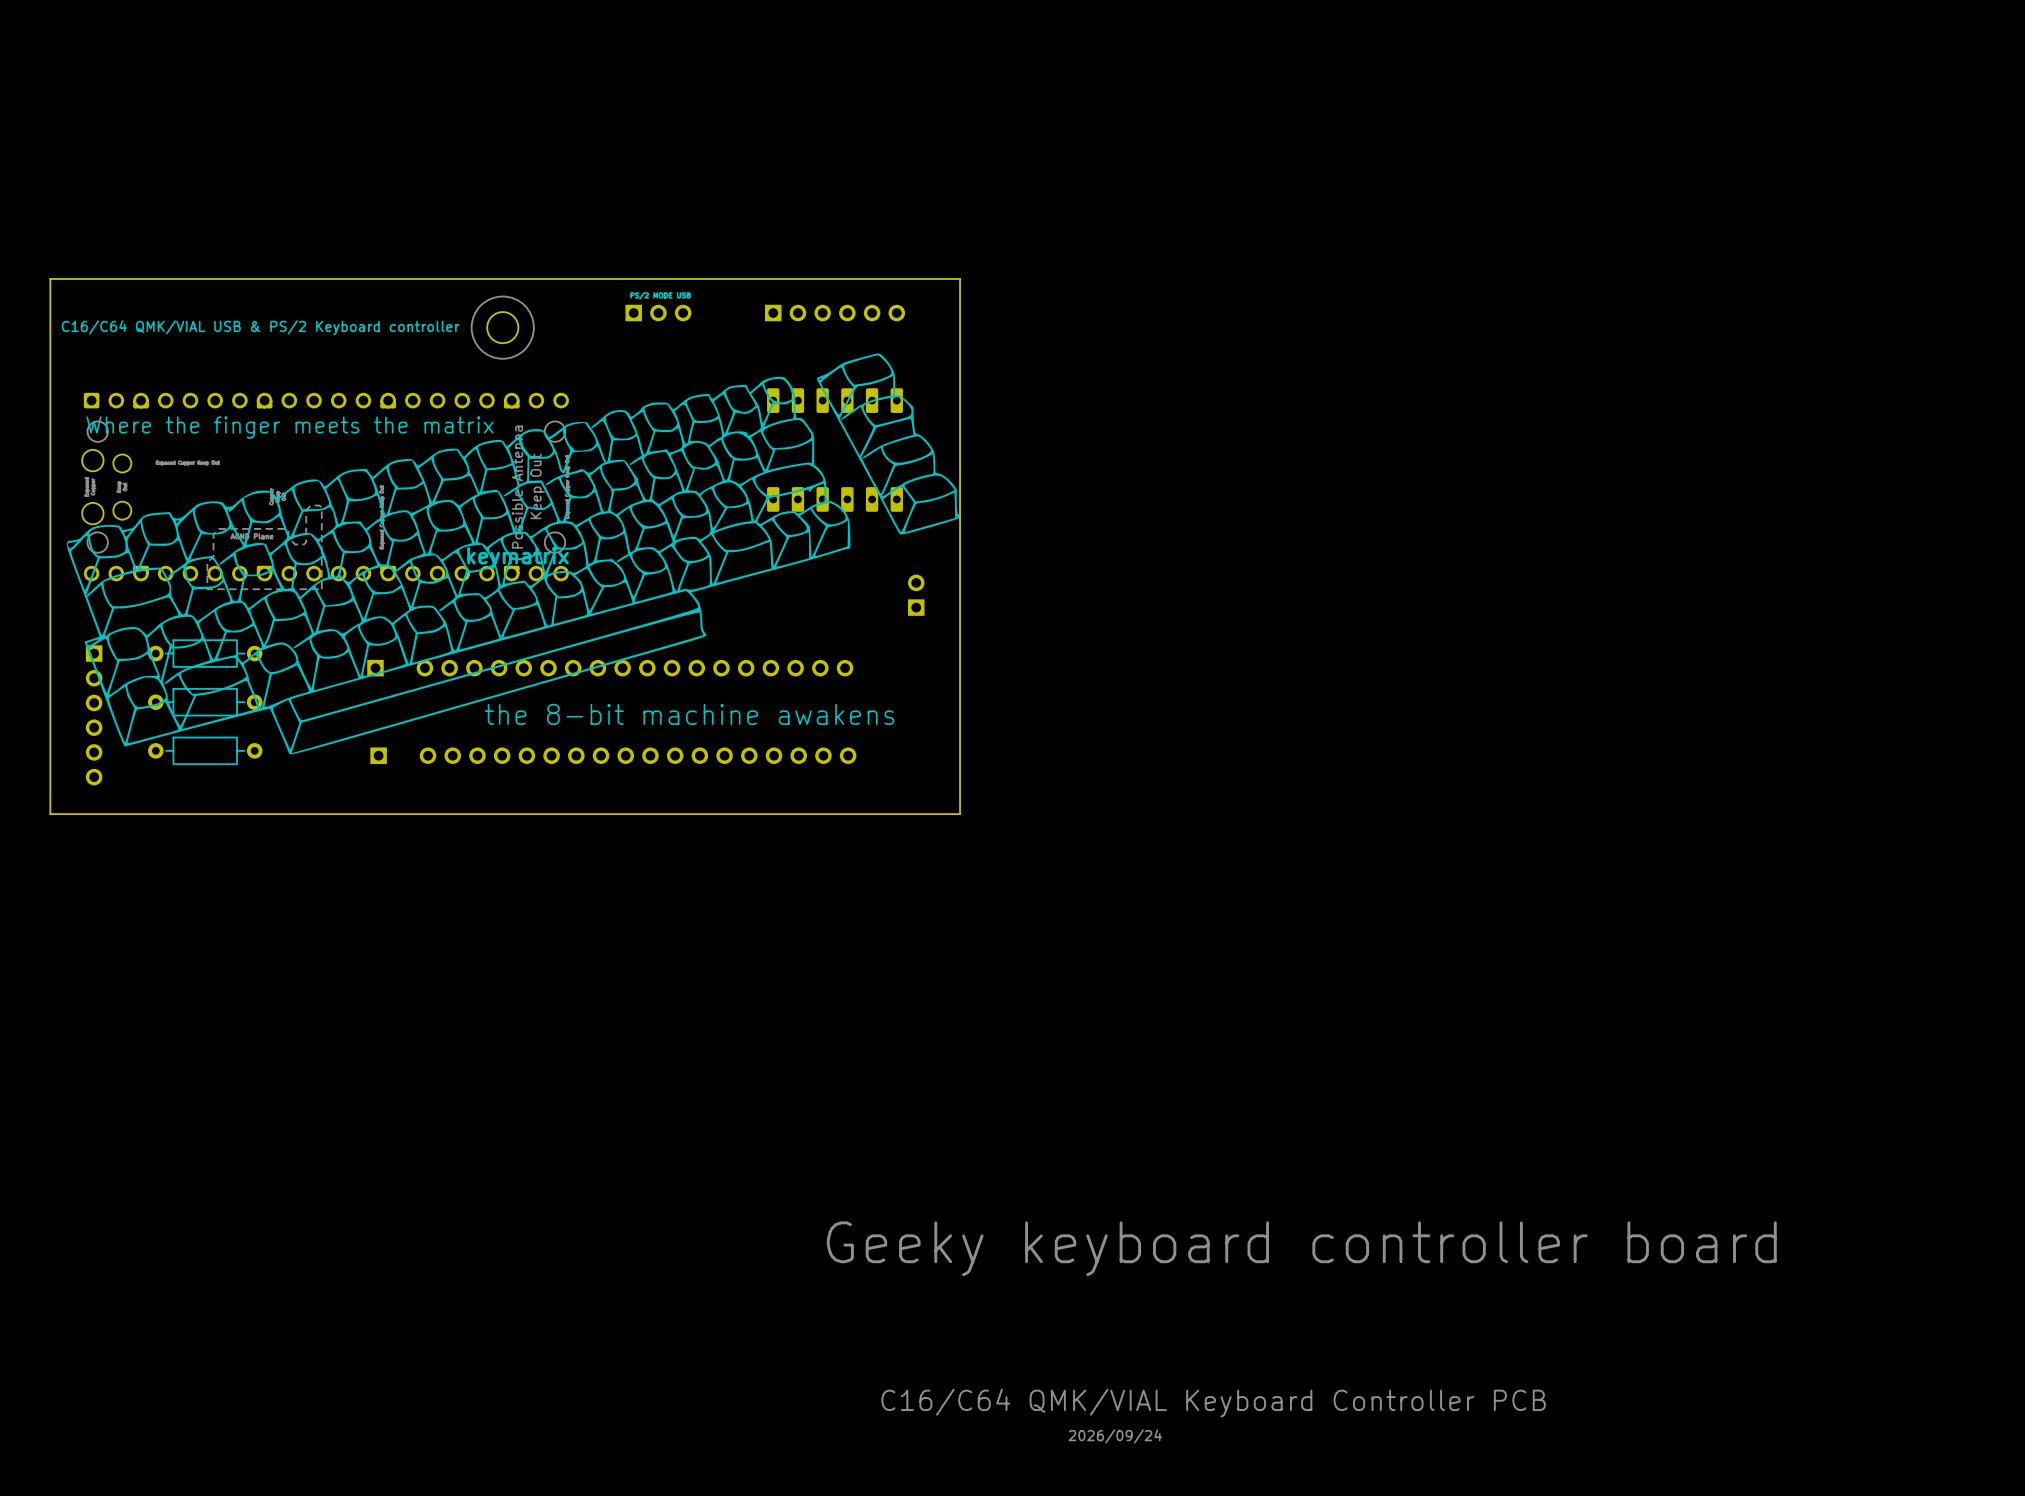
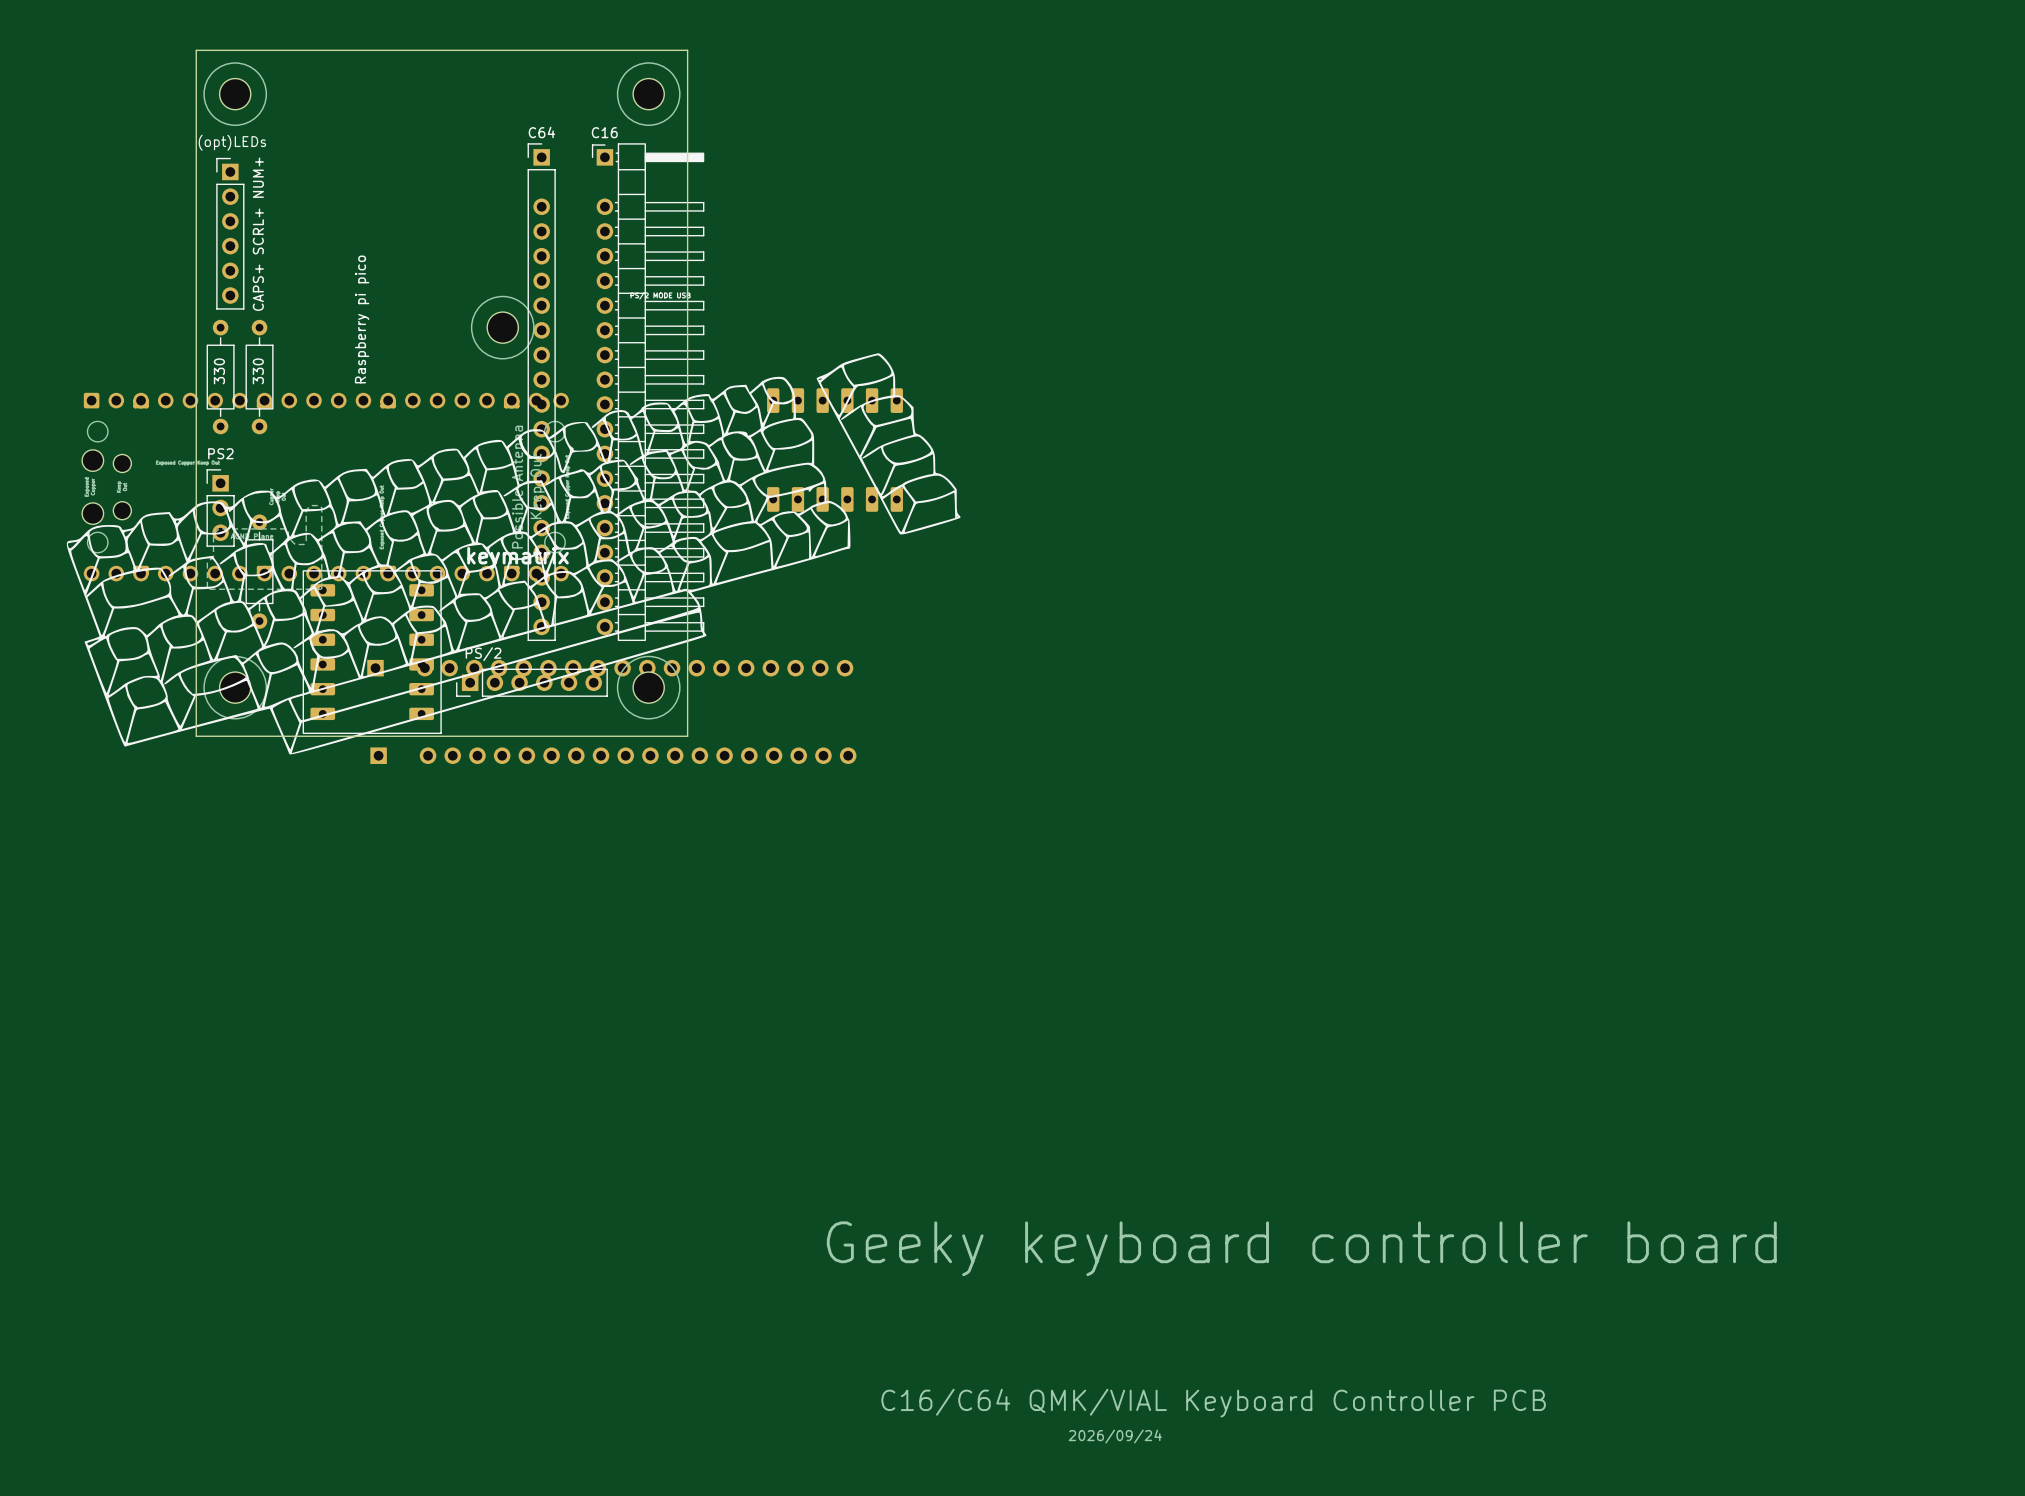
board edge: none -> (196, 50) (687, 50) (687, 736) (196, 736) (196, 50)
part: none -> (235, 94)
part: none -> (648, 94)
text: none -> (opt)LEDs (232, 142)
part: none -> (230, 233)
text: none -> CAPS+ SCRL+ NUM+ (258, 234)
board edge: (50, 278) (960, 278) (960, 814) (50, 814) (50, 278) -> none
part: (658, 313) -> none
part: (835, 313) -> none
text: none -> Raspberry pi pico (362, 319)
text: C16/C64 QMK/VIAL USB & PS/2 Keyboard controller (260, 327) -> none
text: none -> 330 (219, 371)
text: none -> 330 (258, 371)
part: none -> (220, 377)
part: none -> (259, 377)
C64: none -> (541, 392)
C16: none -> (648, 392)
text: Where the finger meets the matrix (290, 427) -> none
PS2: none -> (220, 508)
part: none -> (259, 571)
part: (916, 595) -> none
part: none -> (372, 652)
part: (205, 653) -> none
PS/2: none -> (531, 682)
part: none -> (235, 687)
part: none -> (648, 687)
part: (205, 702) -> none
text: the 8-bit machine awakens (689, 714) -> none
part: (94, 715) -> none
part: (205, 750) -> none

